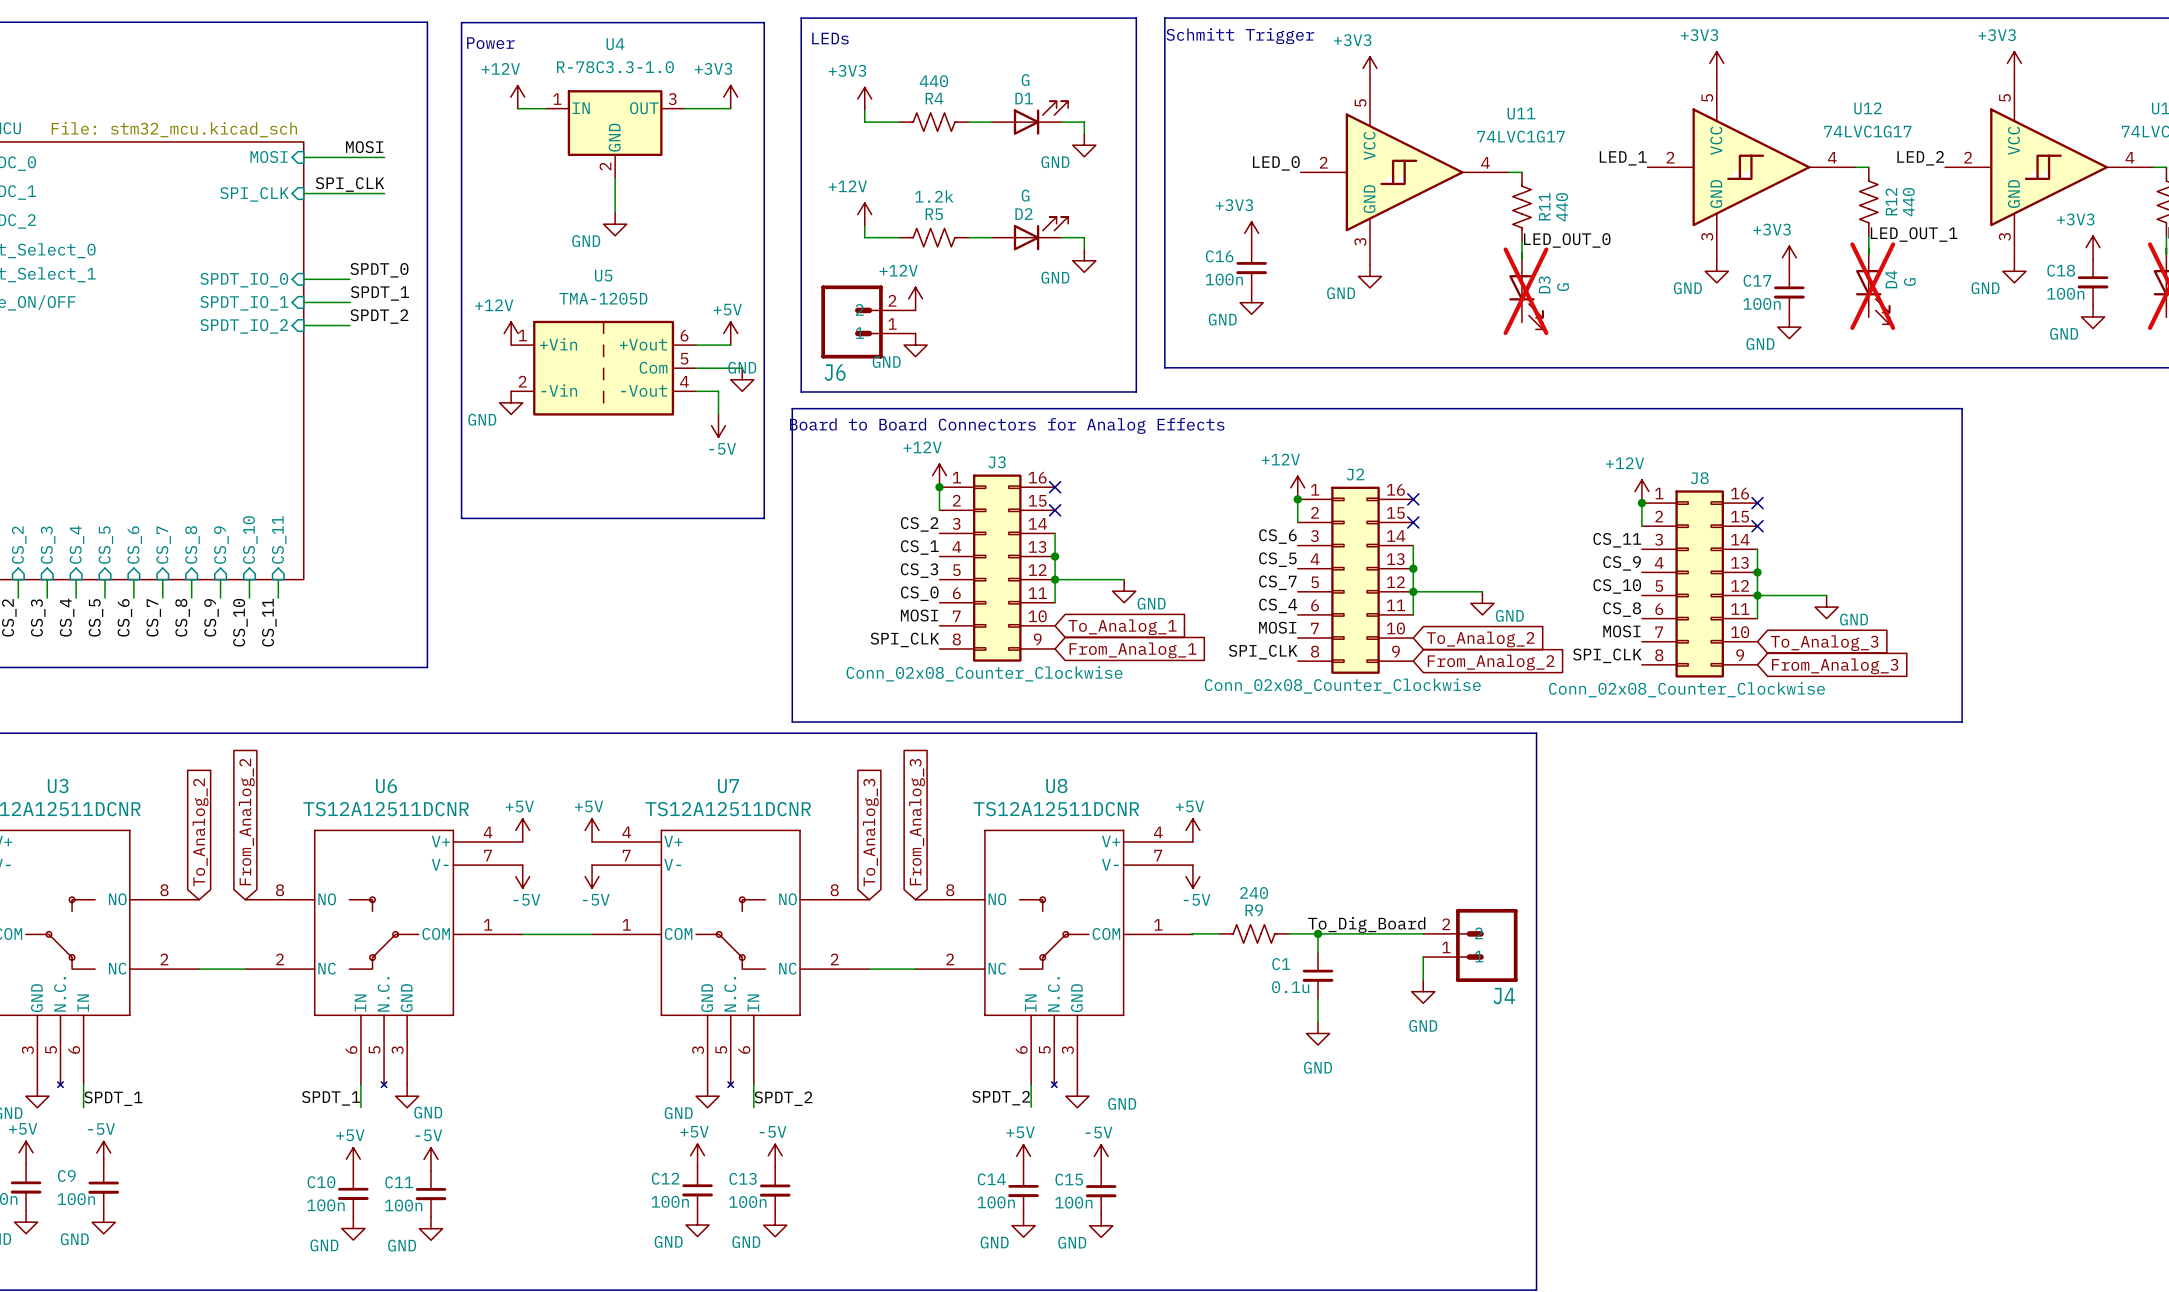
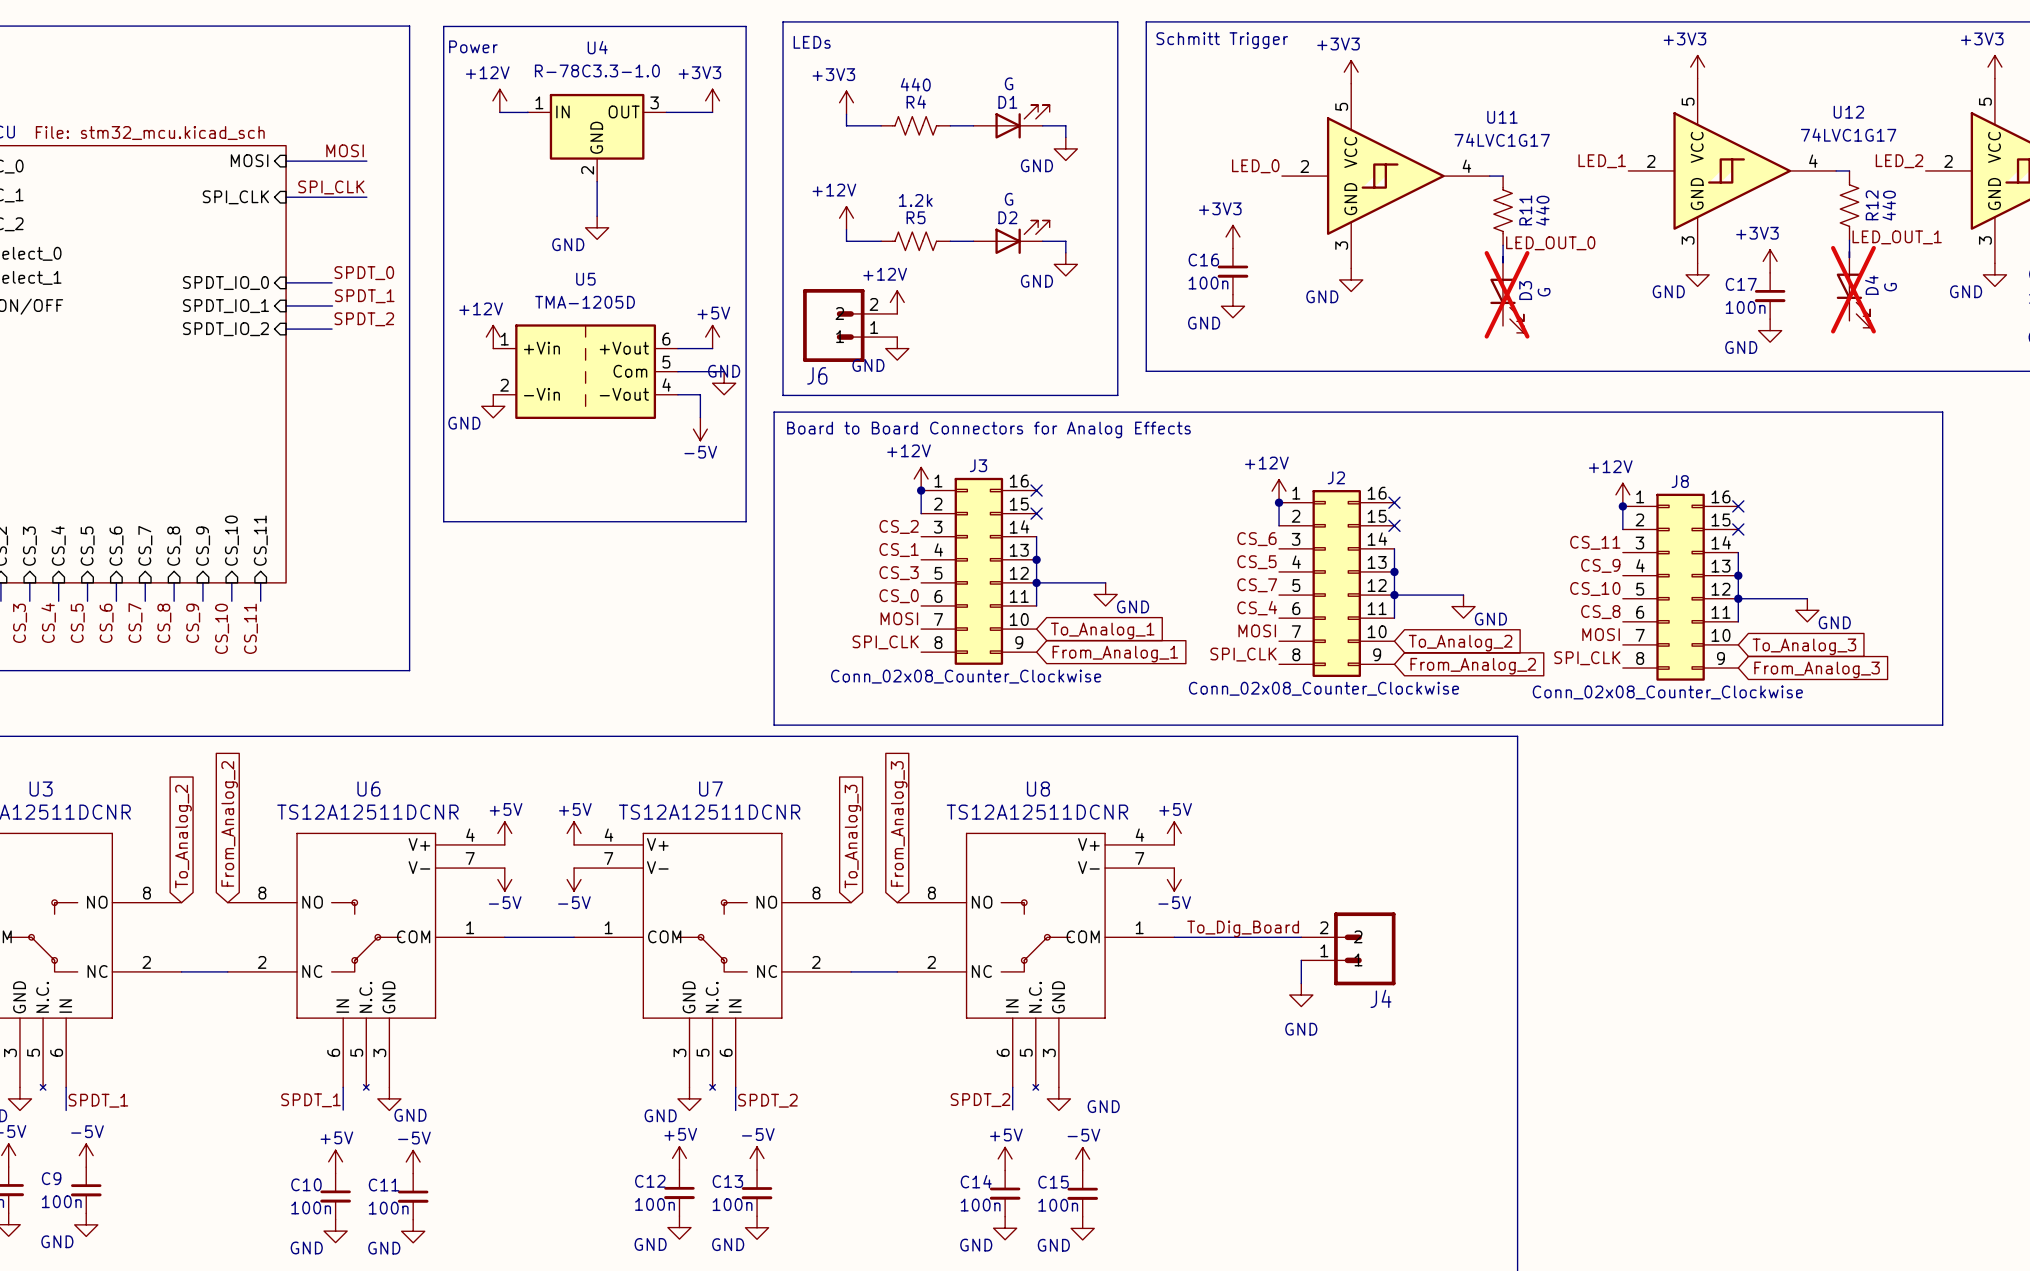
label position: To_Dig_Board (1366, 924) -> To_Dig_Board (1243, 928)
wire: (1219, 933) (1192, 934) -> (1301, 937) (1174, 937)
R9: 240 (1254, 933) -> none
wire: (1288, 933) (1423, 933) -> none
wire: (1318, 933) (1318, 952) -> none
junction: (1318, 933) -> none
J4 position: (1470, 945) -> (1348, 948)
wire: (1423, 957) (1423, 980) -> none
C1: 0.1u (1318, 975) -> none
power symbol: GND (1423, 991) -> none
wire: (1318, 998) (1318, 1021) -> (1301, 960) (1301, 983)
power symbol position: GND (1318, 1033) -> GND (1301, 995)

